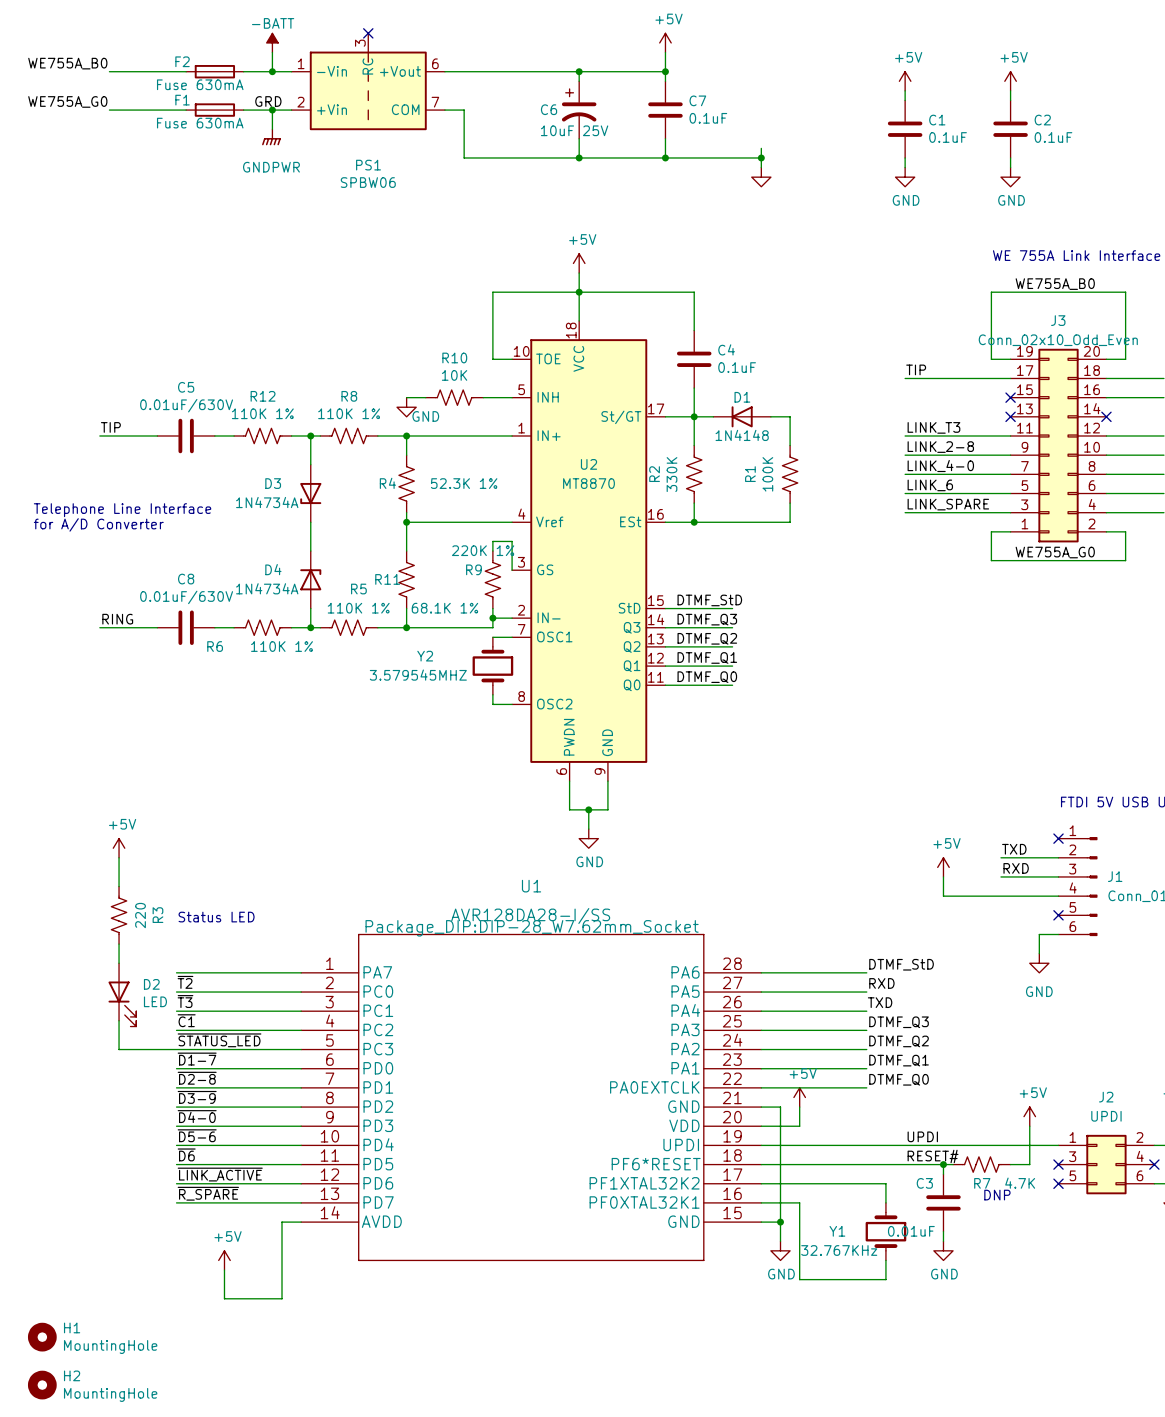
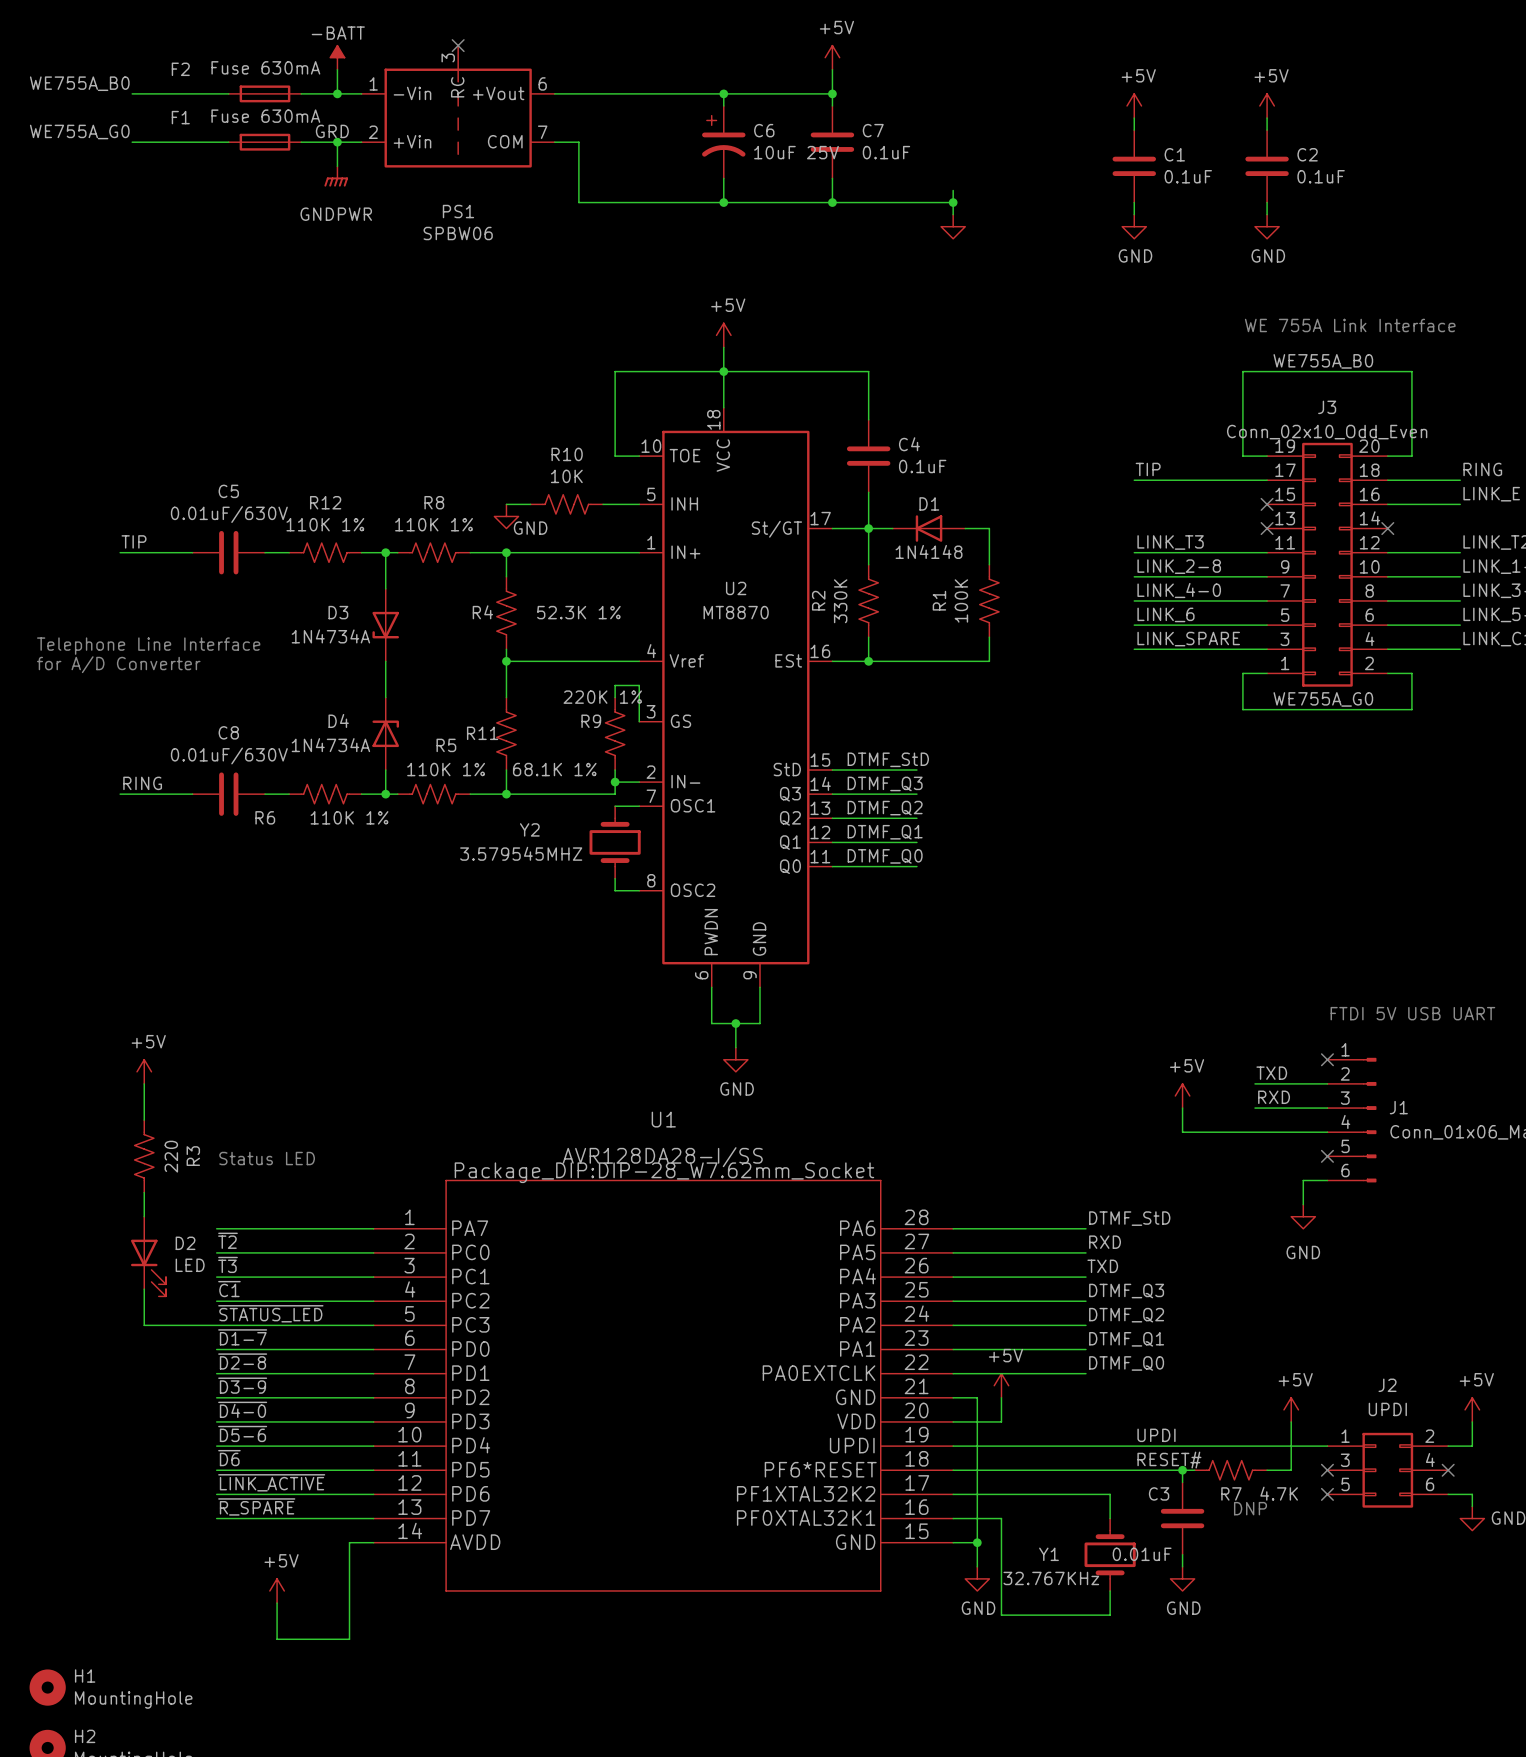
F2 name position: F2 (182, 61) -> F2 (180, 69)
F2 value position: Fuse 630mA (200, 84) -> Fuse 630mA (265, 67)
F1 name position: F1 (182, 100) -> F1 (180, 117)
C6 name position: C6 (549, 109) -> C6 (764, 130)
F1 value position: Fuse 630mA (200, 123) -> Fuse 630mA (265, 116)
C6 value position: 10uF 25V (574, 130) -> 10uF 25V (796, 152)

